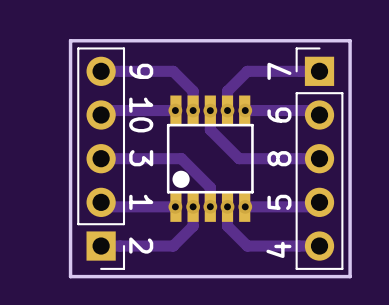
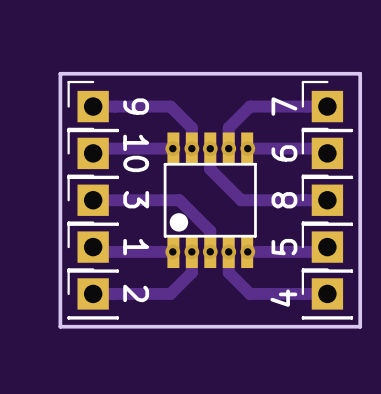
part footprint: [77, 47, 126, 270] -> [67, 174, 119, 226]
part footprint: [295, 47, 344, 270] -> [301, 174, 354, 226]
part: none -> (93, 106)
part: none -> (327, 106)
part: none -> (93, 153)
part: none -> (327, 153)
part: none -> (93, 247)
part: none -> (327, 247)
part: none -> (93, 293)
part: none -> (327, 293)

